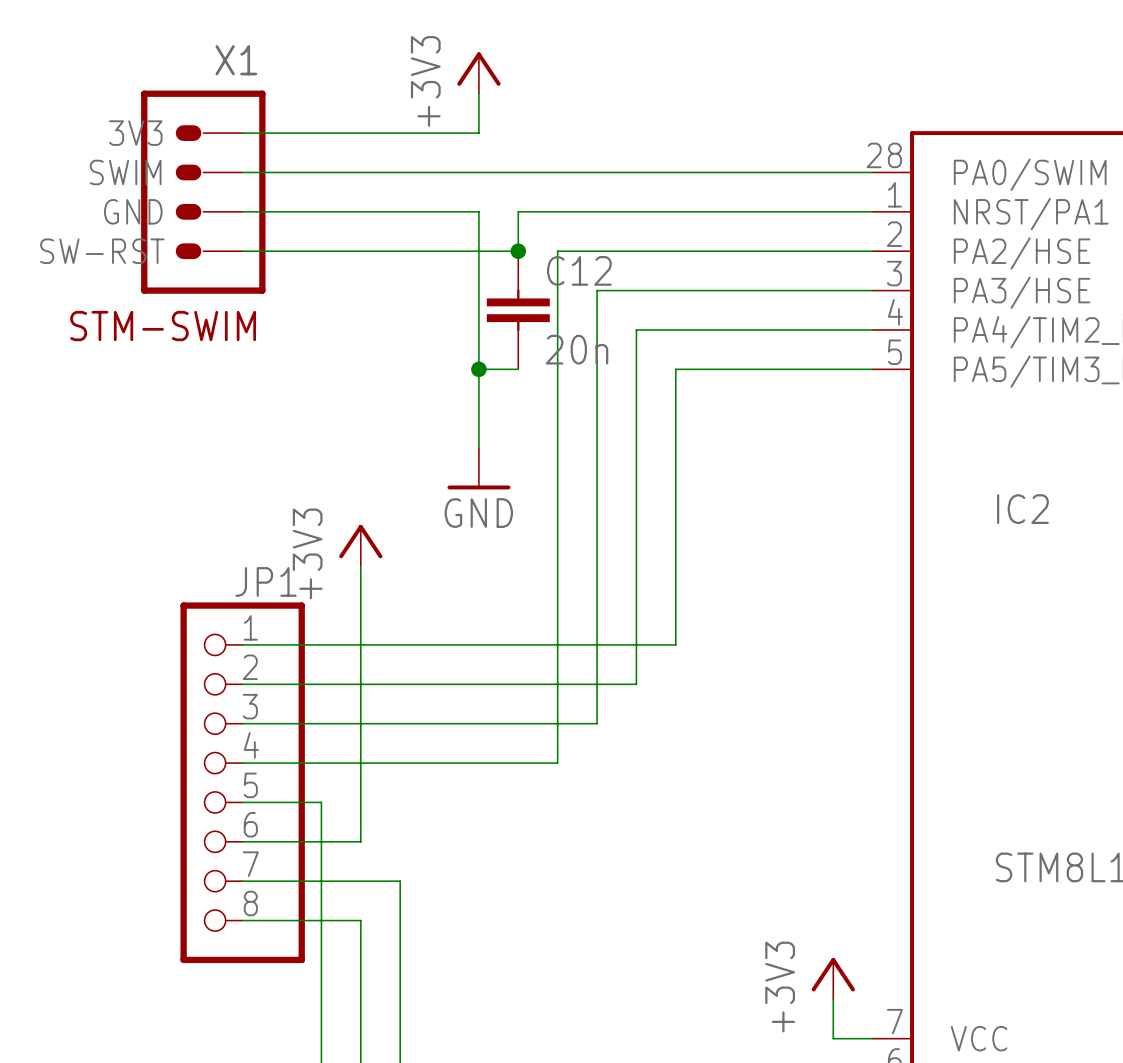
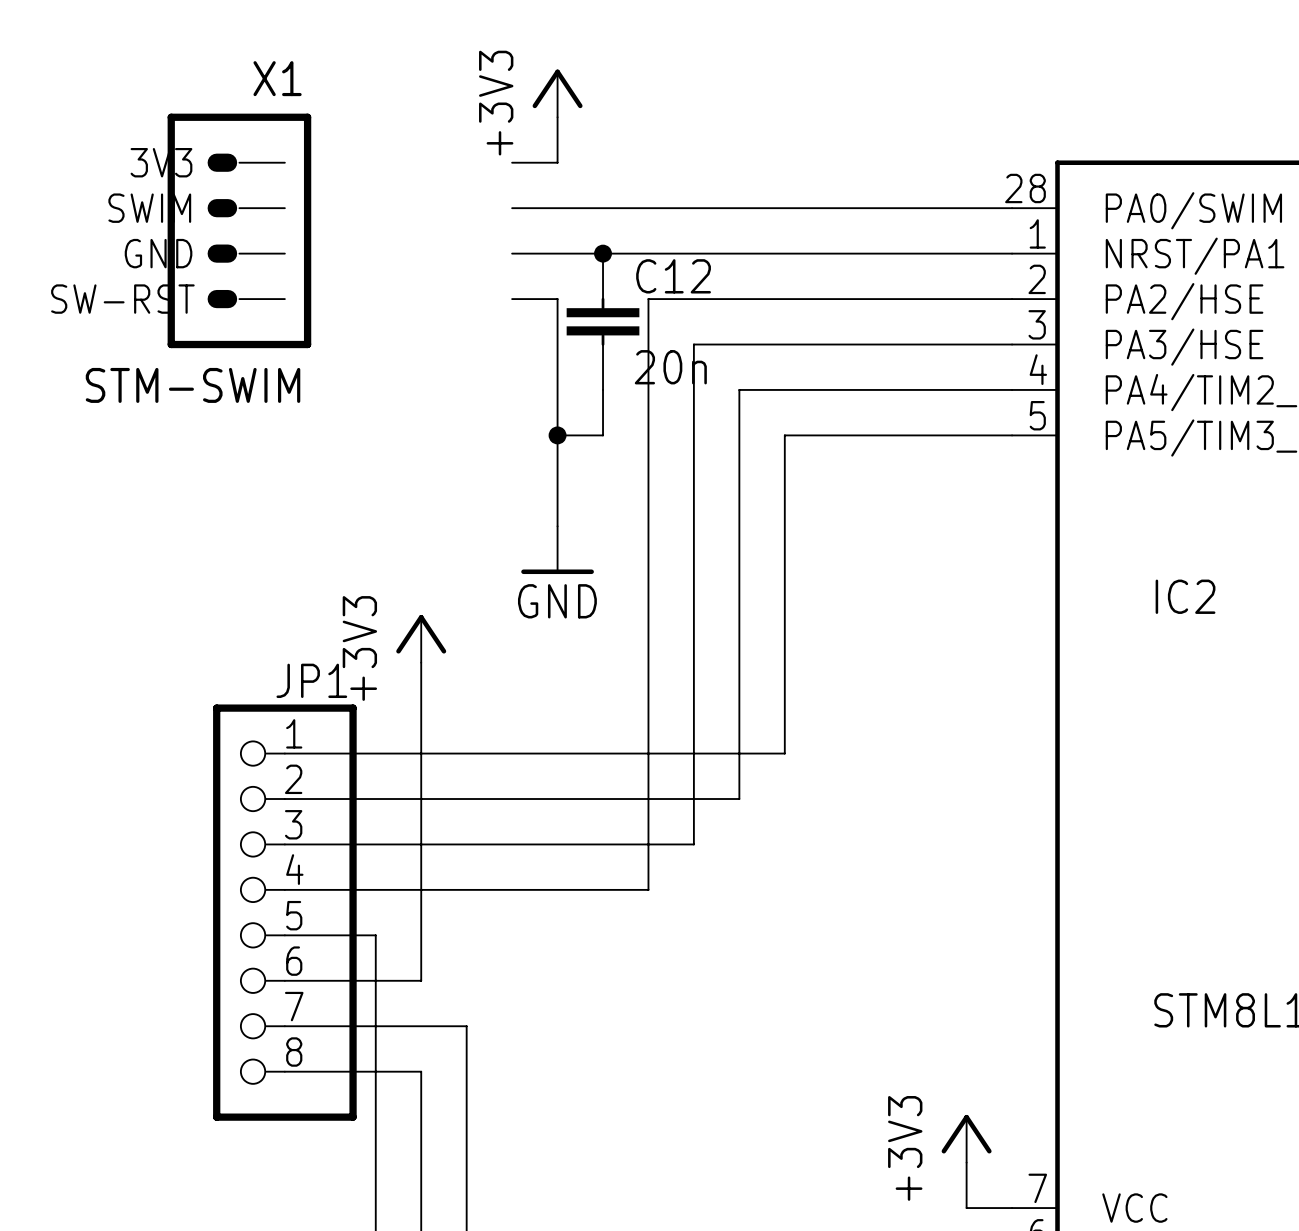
wire: (242, 133) (439, 133) -> none
wire: (242, 172) (439, 172) -> none
wire: (242, 211) (439, 211) -> none
wire: (478, 211) (478, 251) (518, 251) (518, 211) -> (557, 253) (603, 253)
wire: (242, 251) (439, 251) -> none
junction position: (518, 251) -> (603, 253)
C12 position: (518, 310) -> (603, 321)

